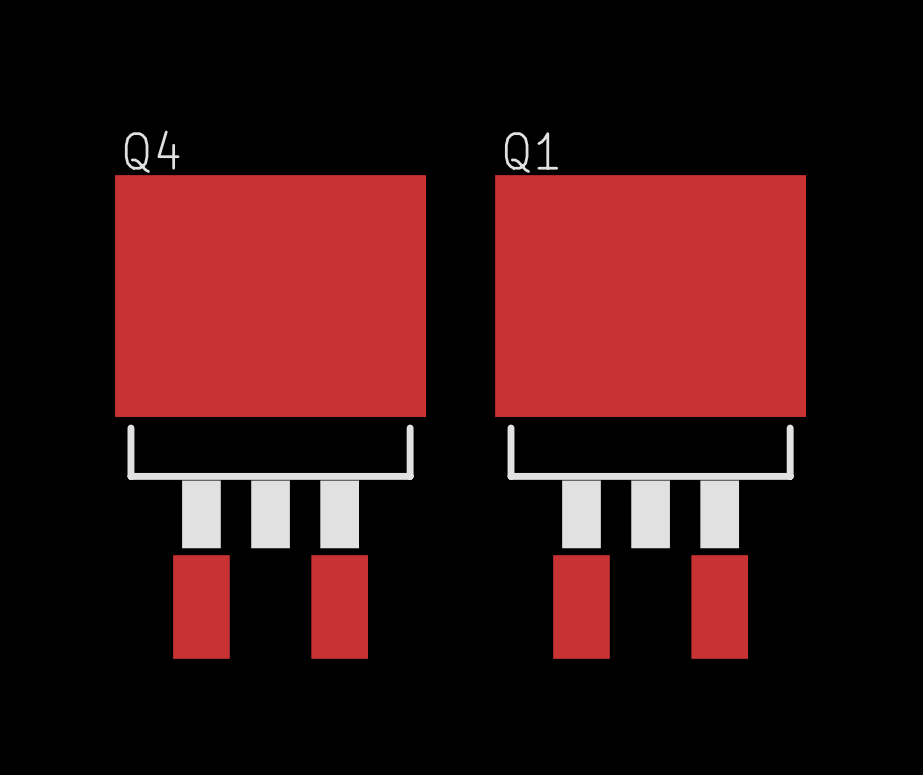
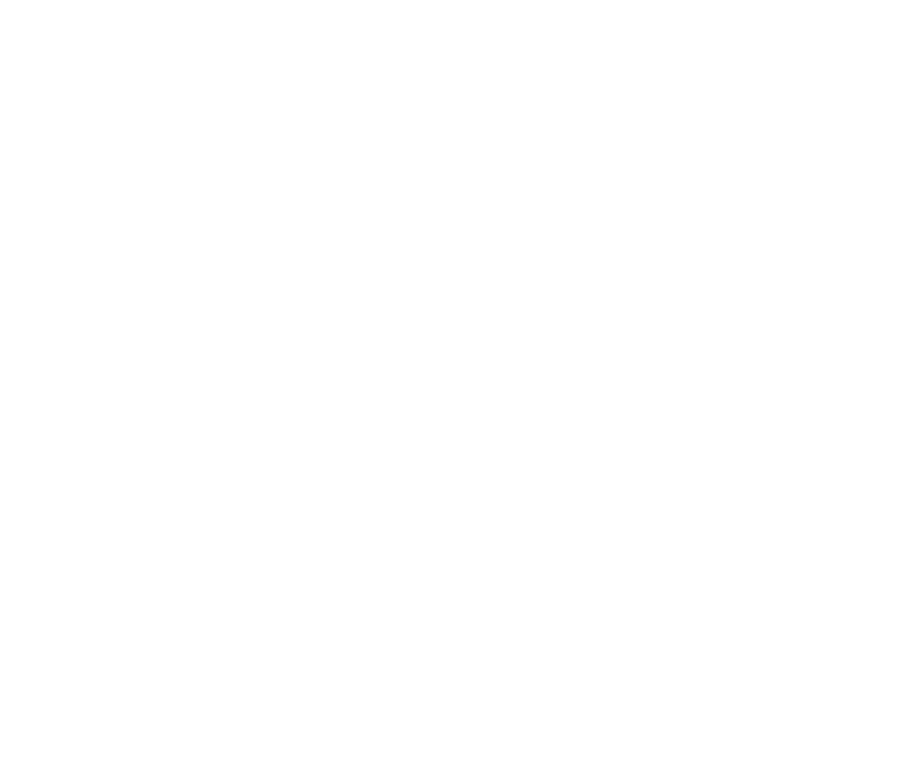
Q4: (270, 416) -> none
Q1: (650, 416) -> none

